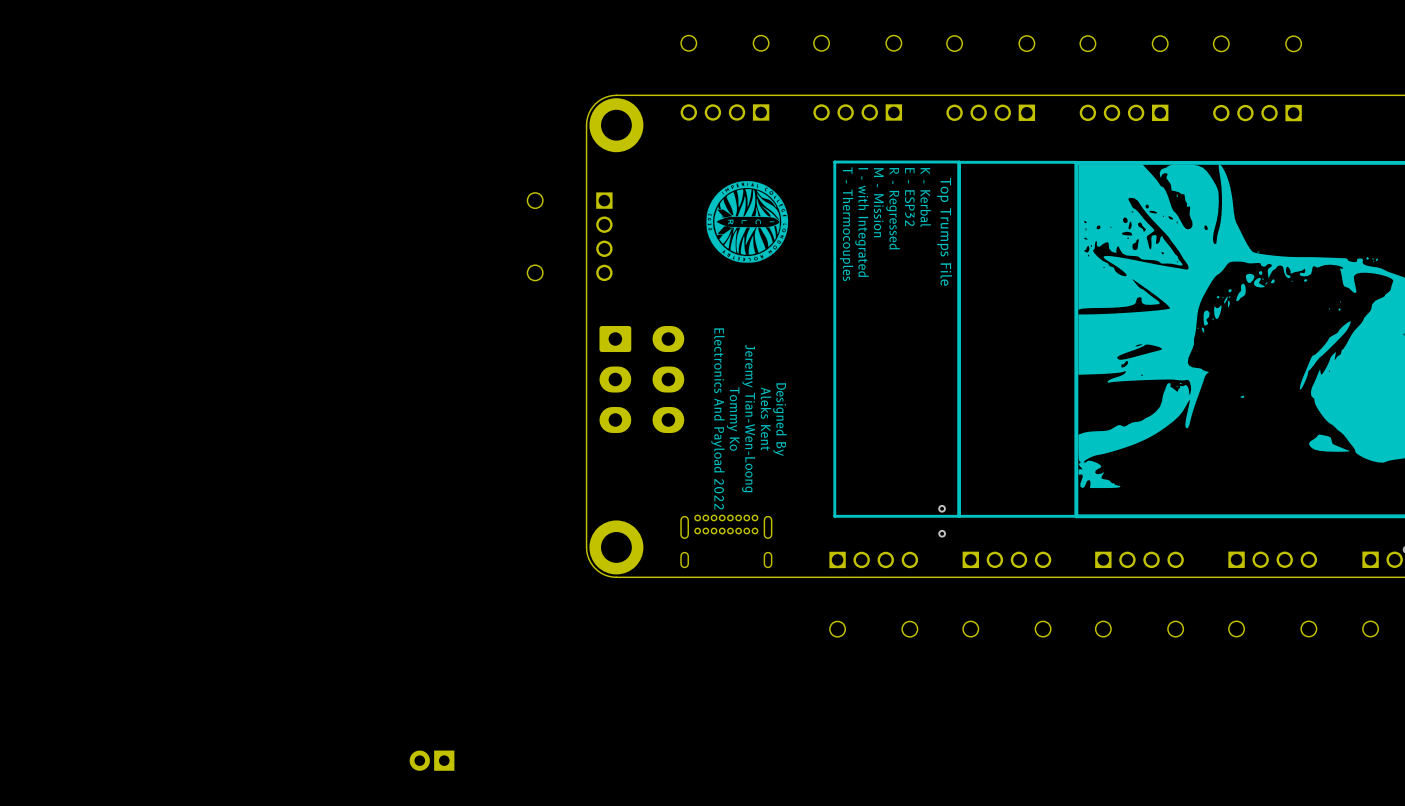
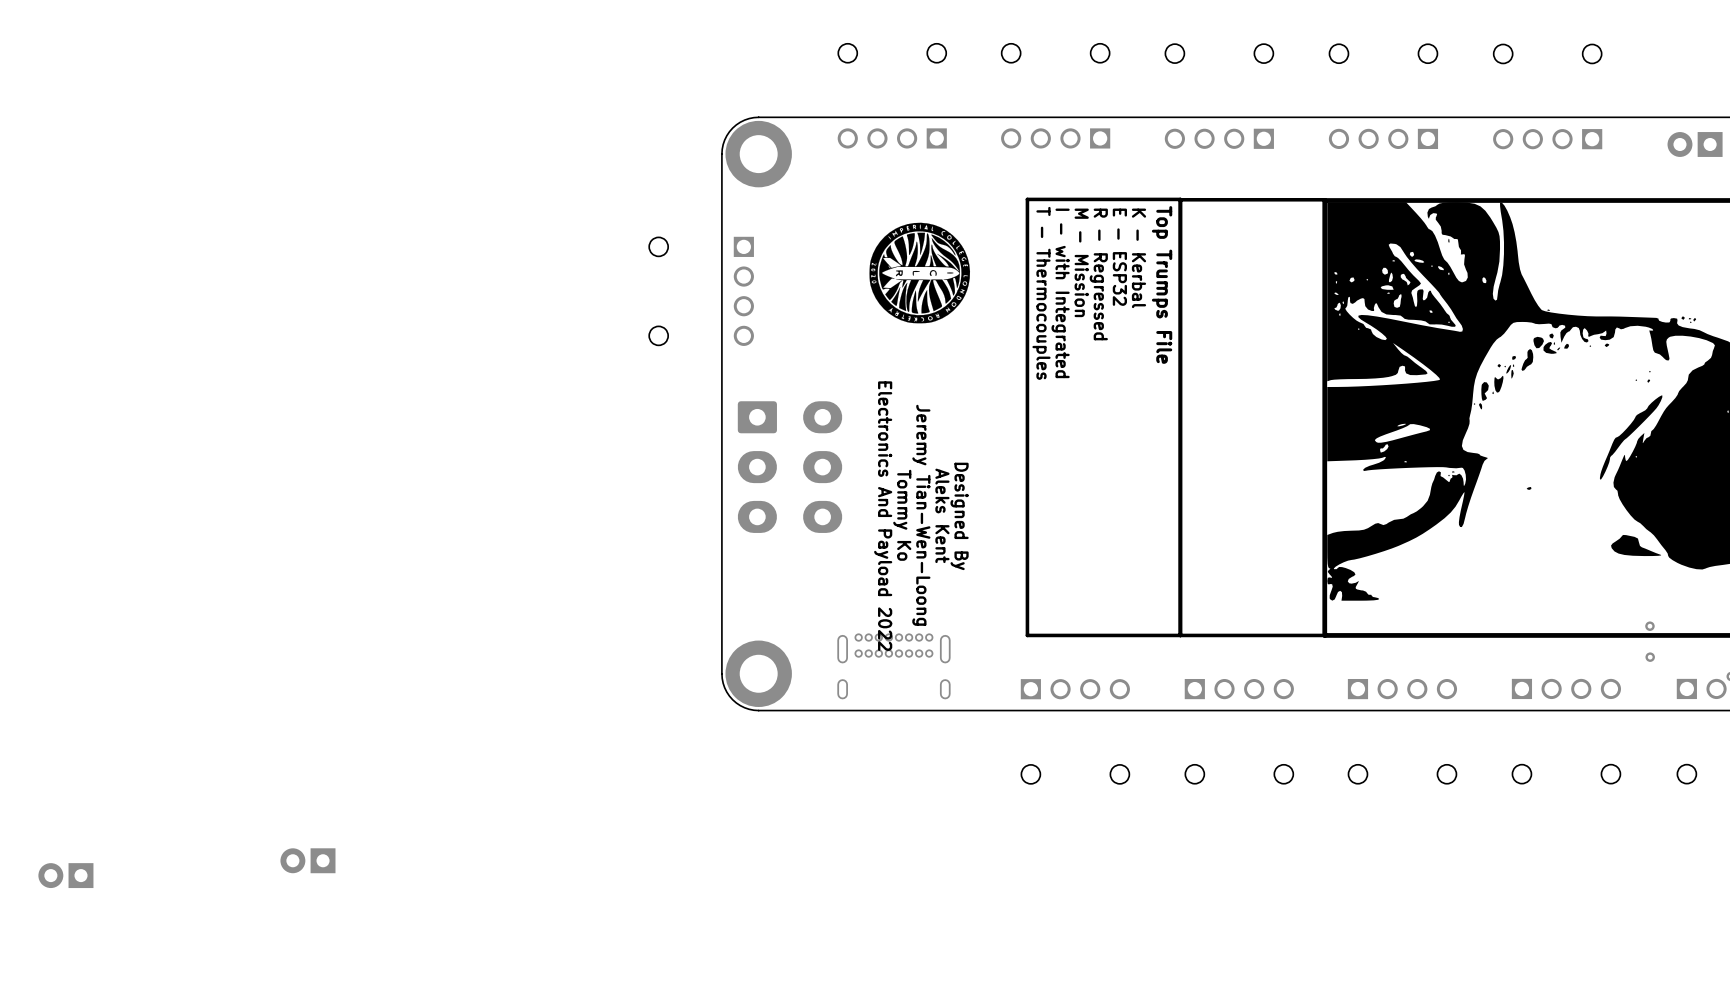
part: none -> (1695, 144)
via: (942, 508) -> none
via: none -> (1649, 626)
via: (942, 533) -> none
via: none -> (1650, 657)
part: none -> (307, 860)
part: none -> (65, 875)
part: (432, 760) -> none

